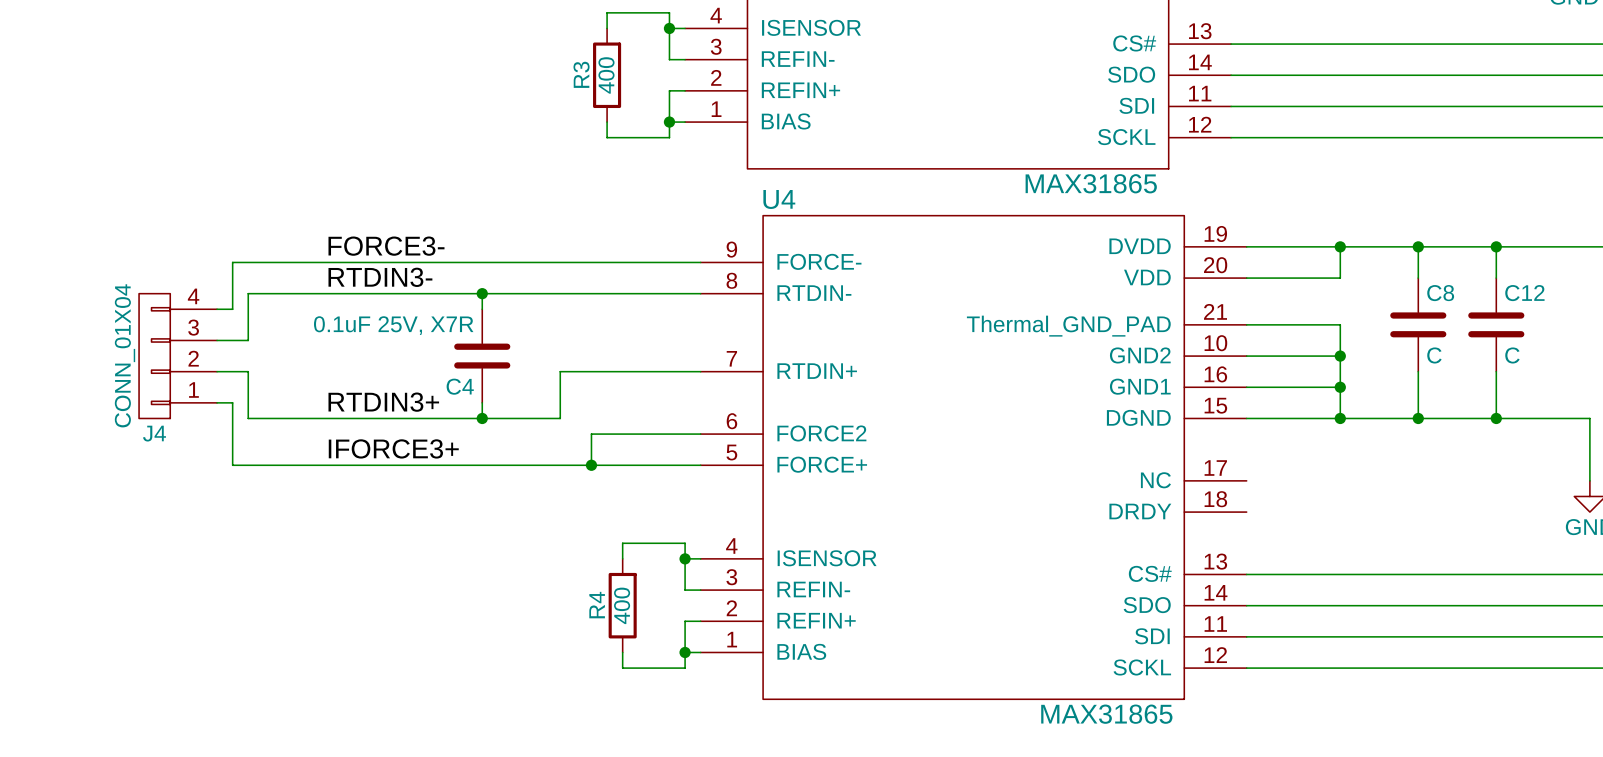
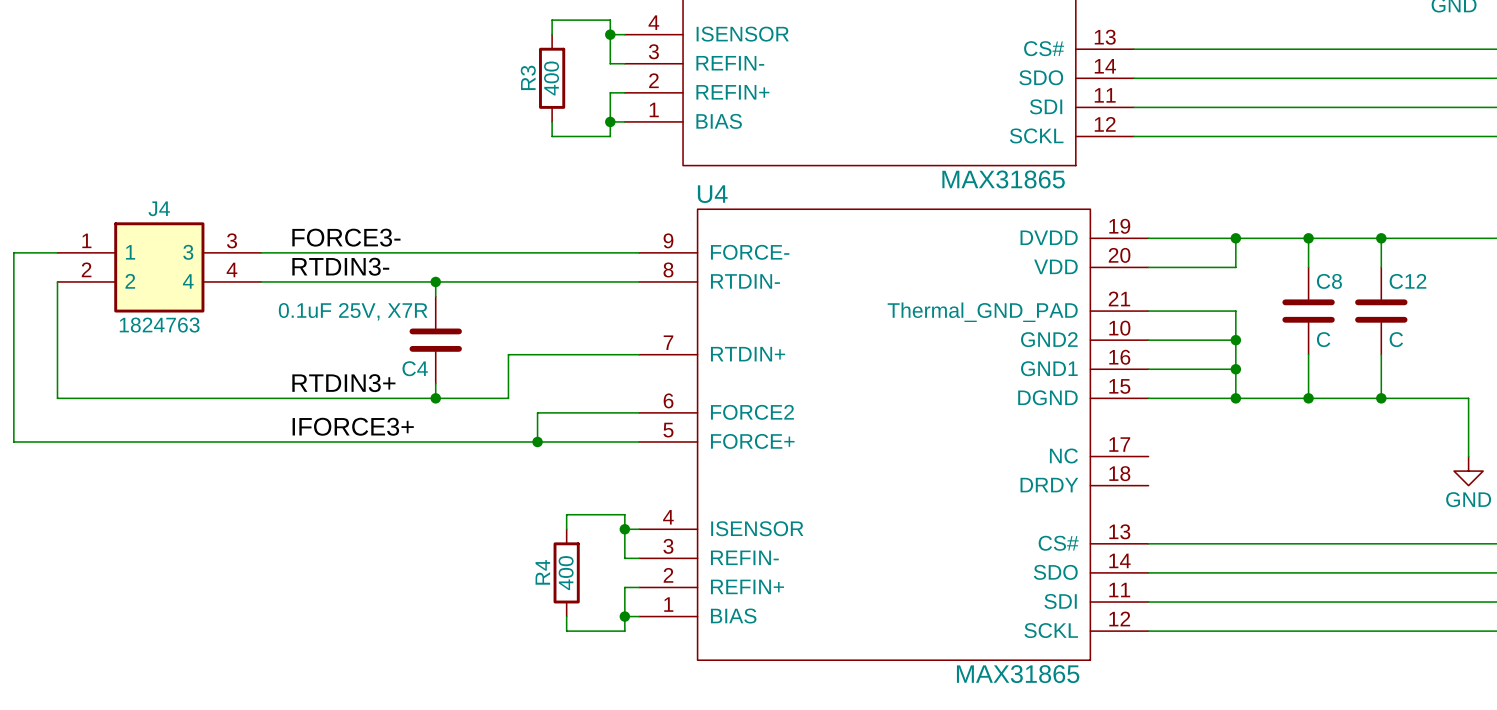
J4 symbol: [139, 293, 218, 419] -> [57, 222, 262, 313]
wire: (295, 293) (248, 293) (248, 340) (217, 340) -> none
J4 value: CONN_01X04 (125, 355) -> 1824763 (159, 325)
wire: (217, 371) (248, 371) (248, 418) -> (57, 281) (57, 398) (217, 398)
wire: (217, 402) (232, 402) (232, 465) -> (57, 252) (13, 252) (13, 441) (202, 441)
J4 name position: J4 (154, 433) -> J4 (159, 208)

